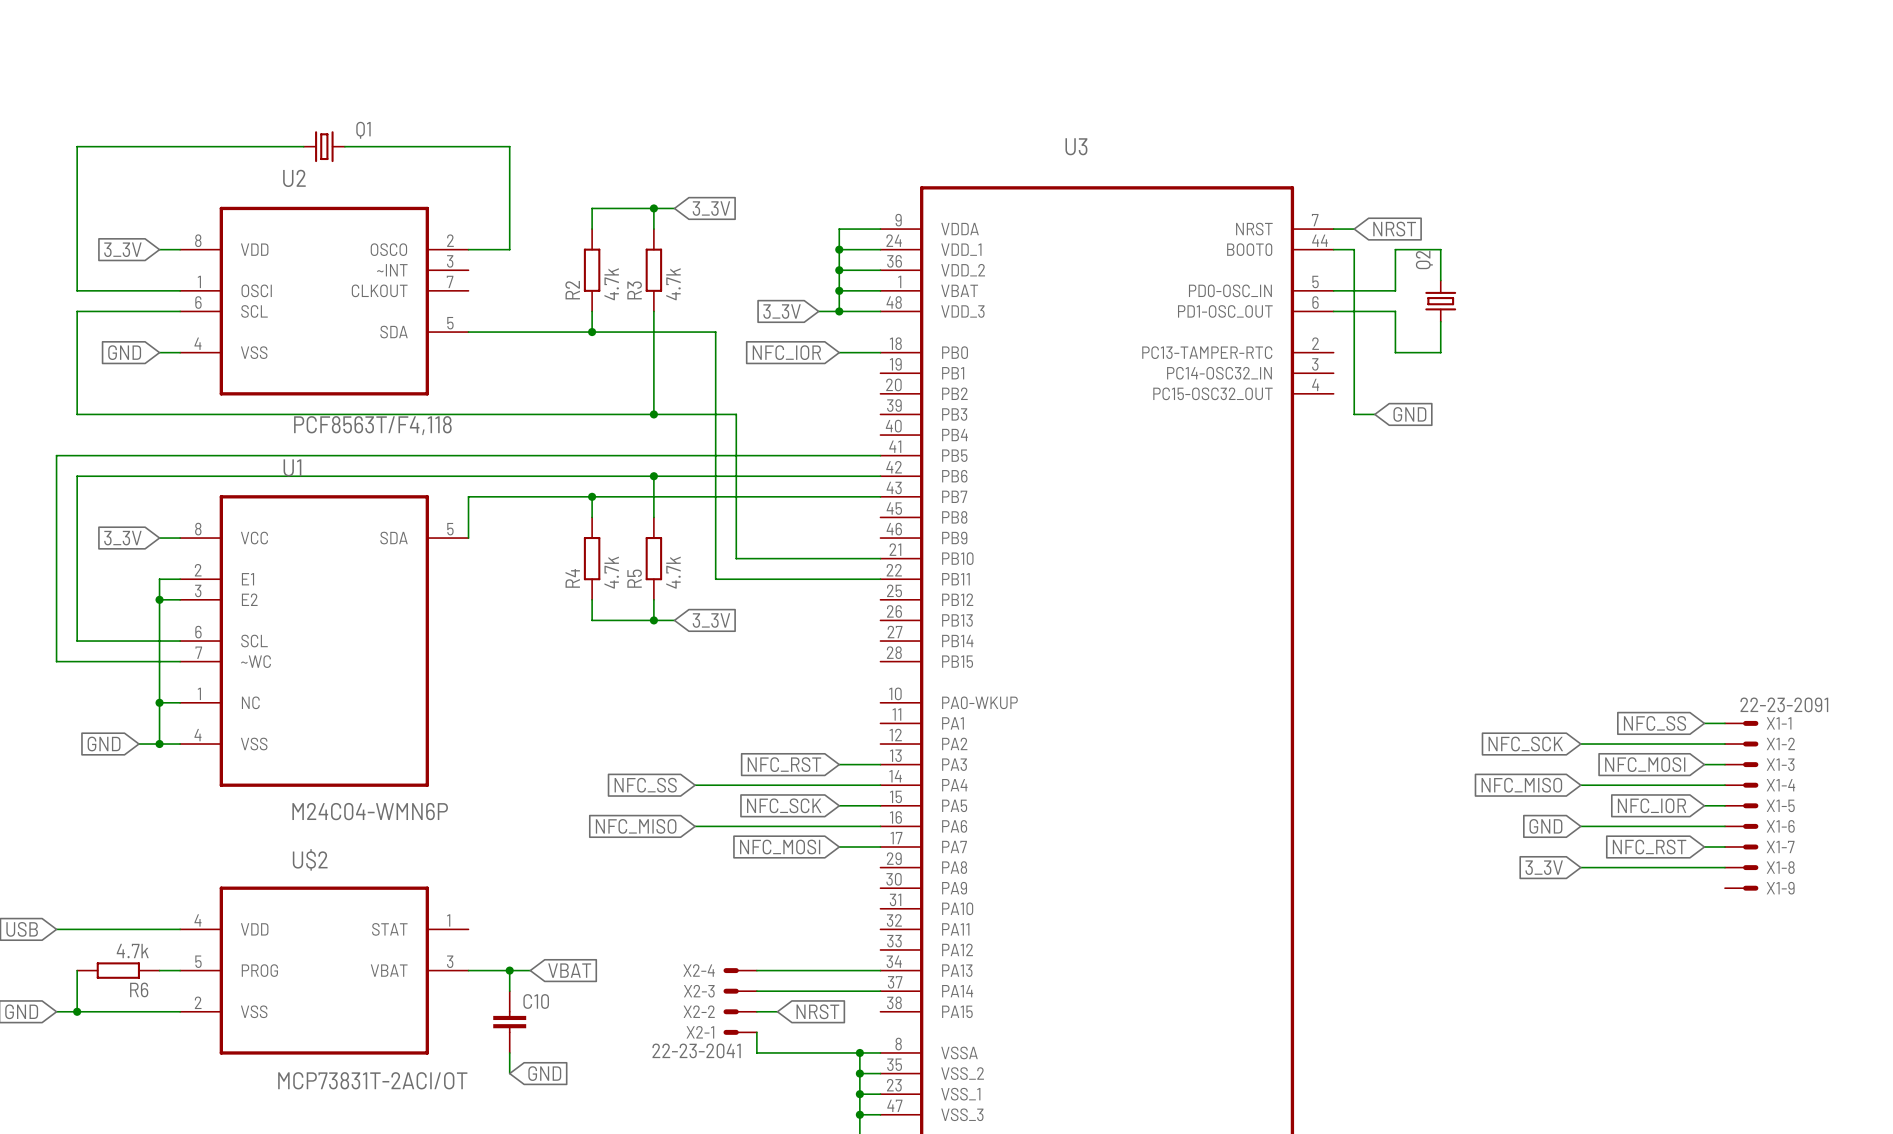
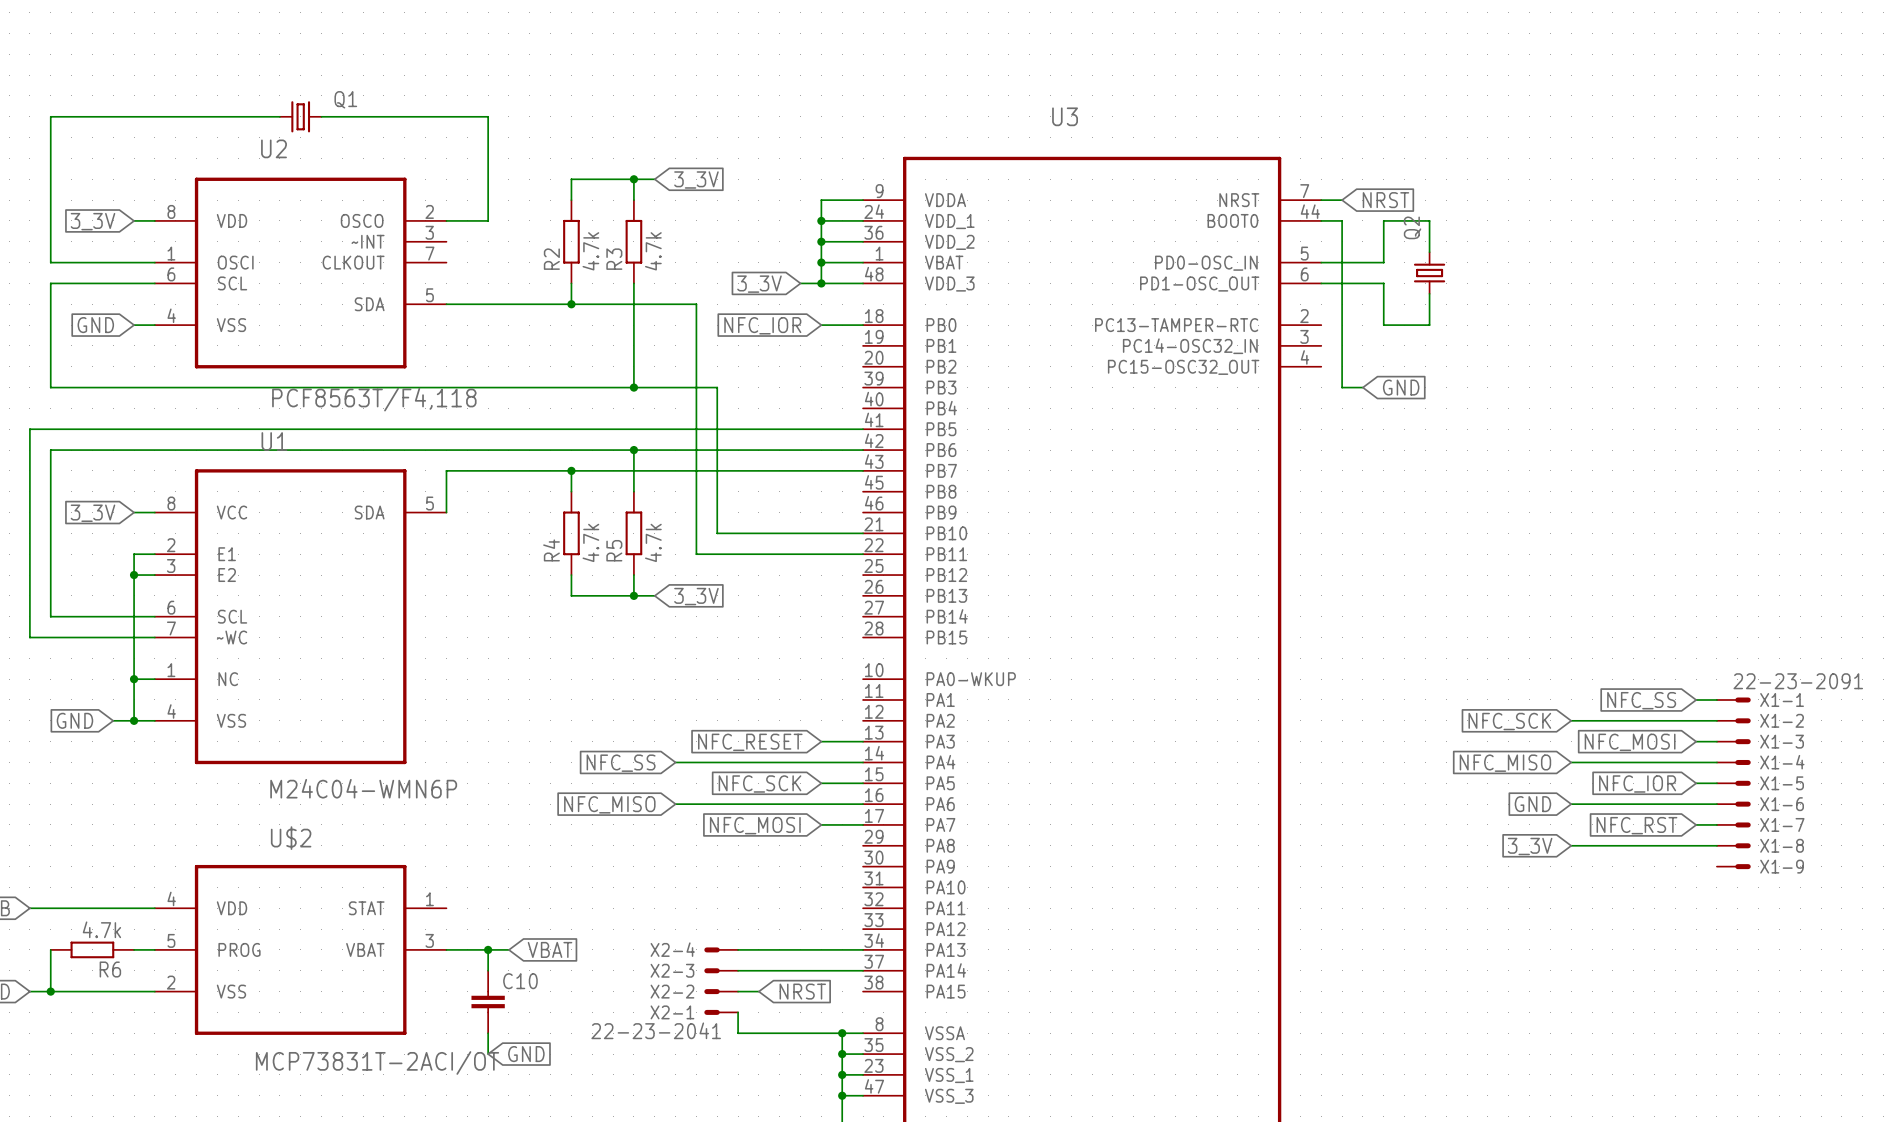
global label: NFC_RST (784, 764) -> NFC_RESET (750, 742)

